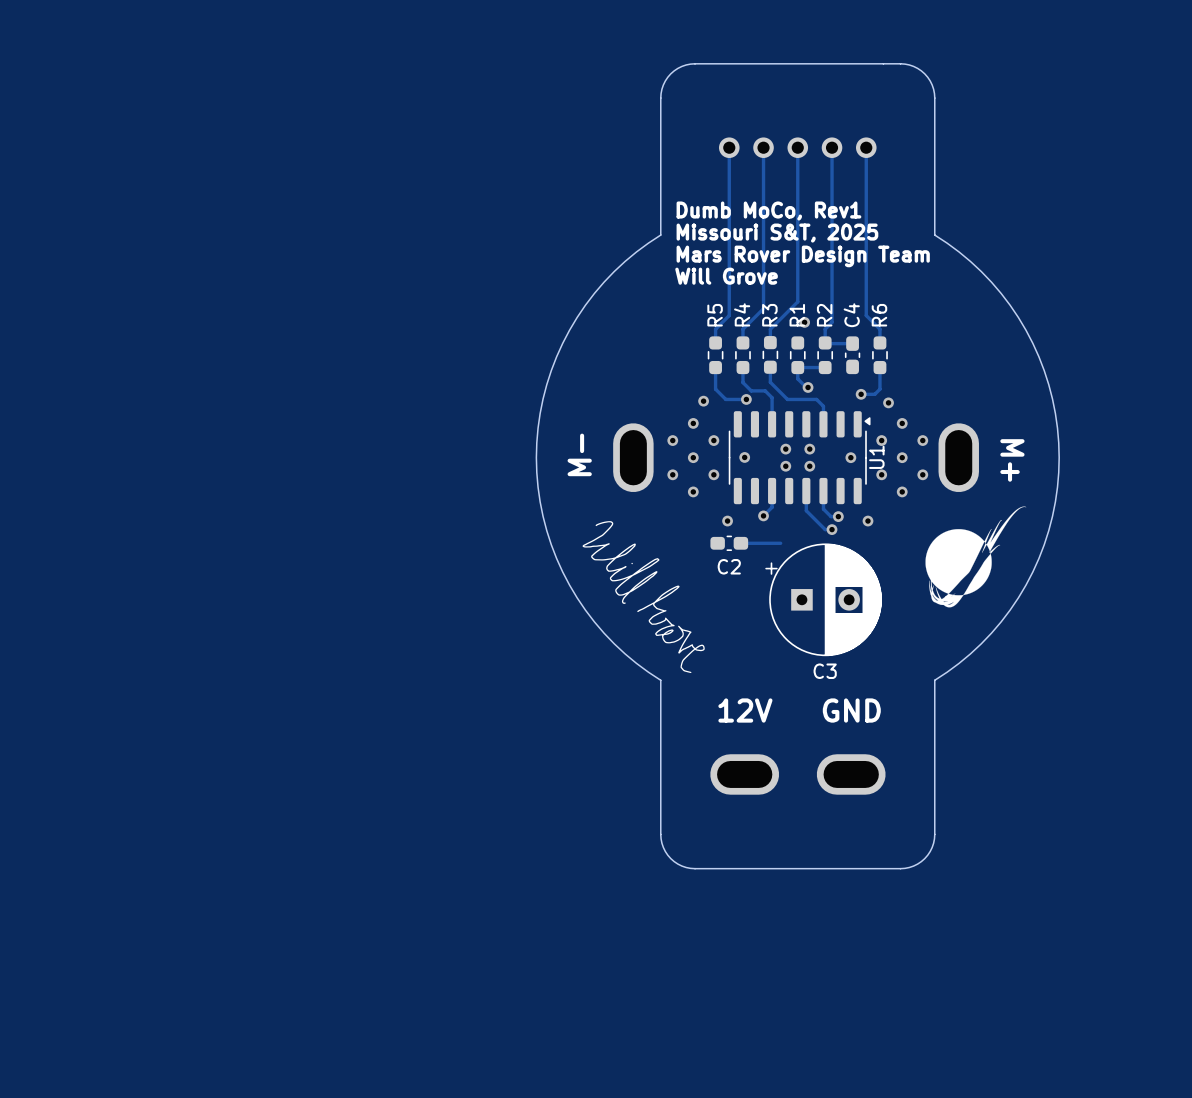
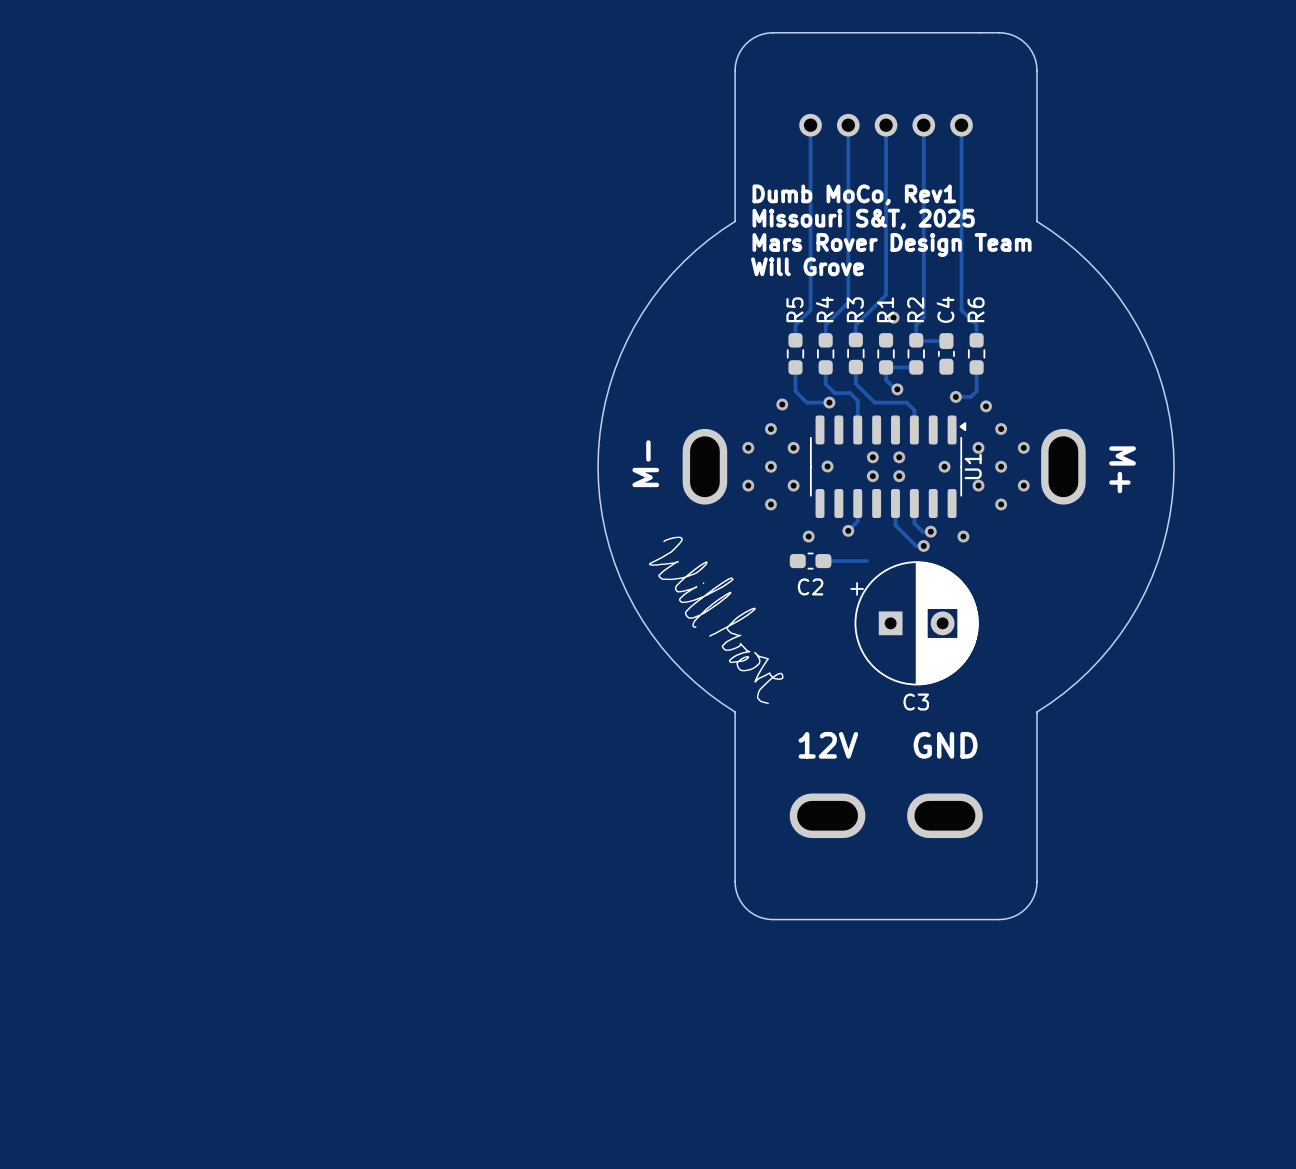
drawing: [925, 506, 1027, 608] -> none

